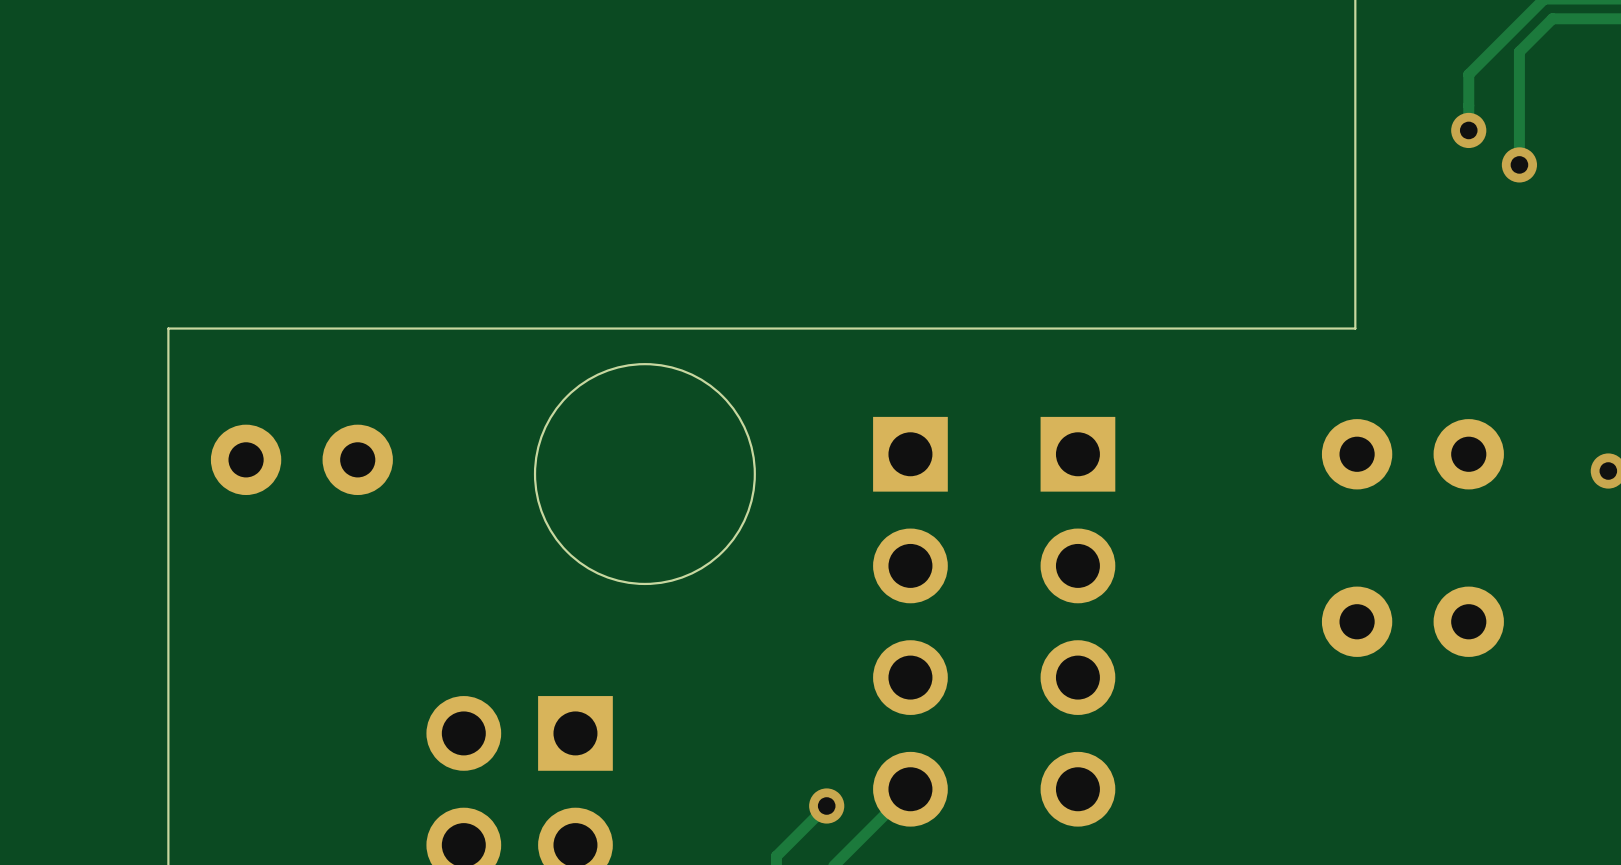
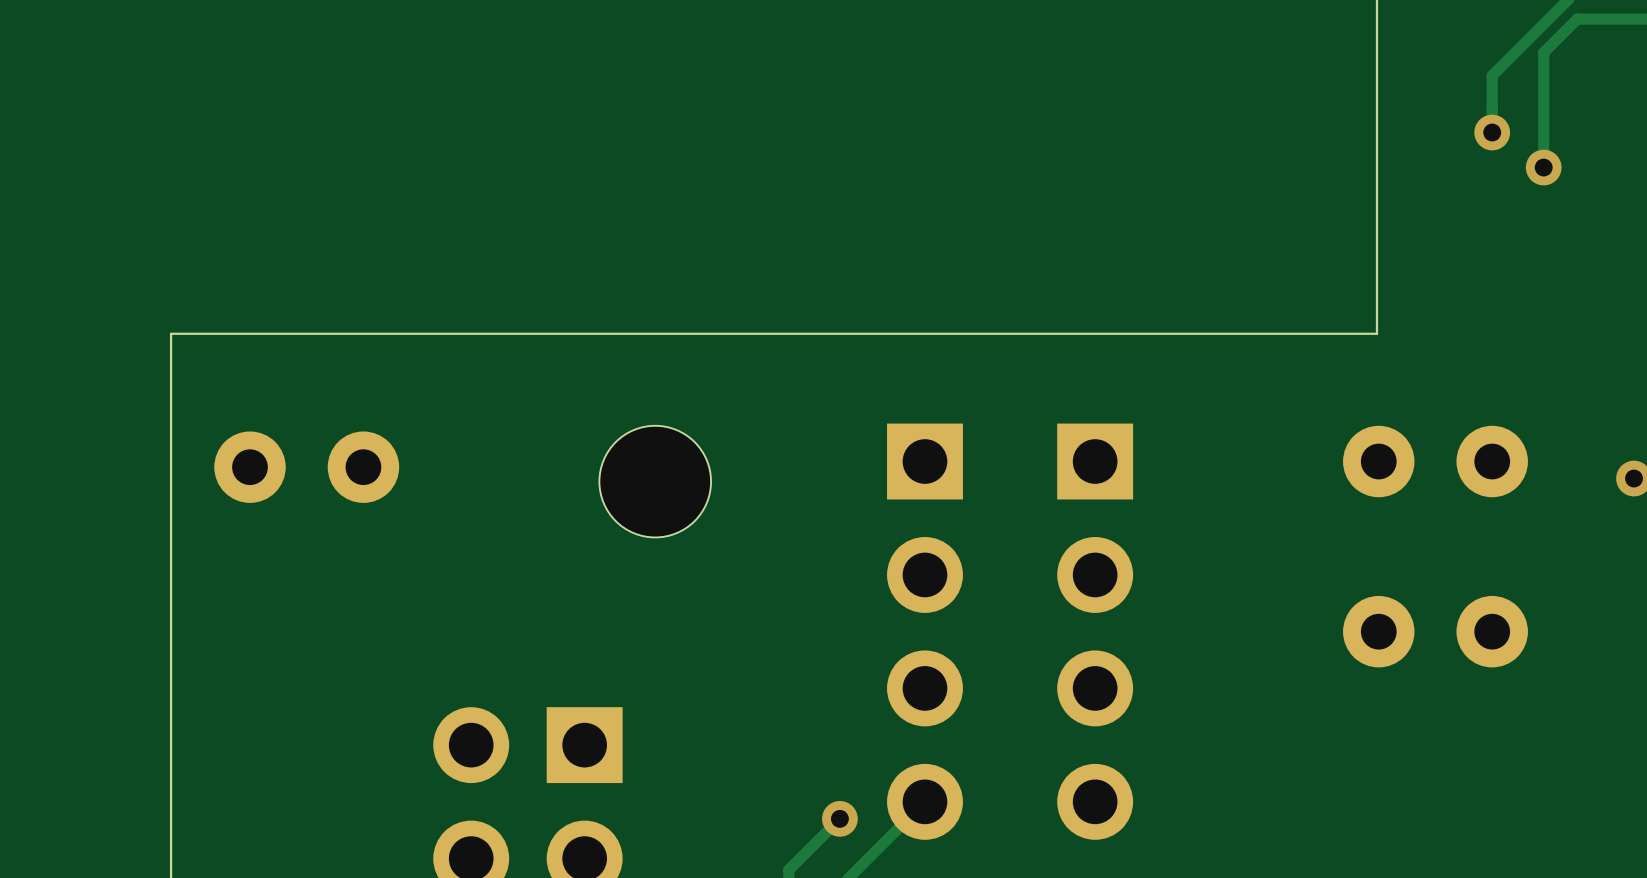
round board edge: [533, 363, 756, 586] -> none
part: none -> (655, 481)

